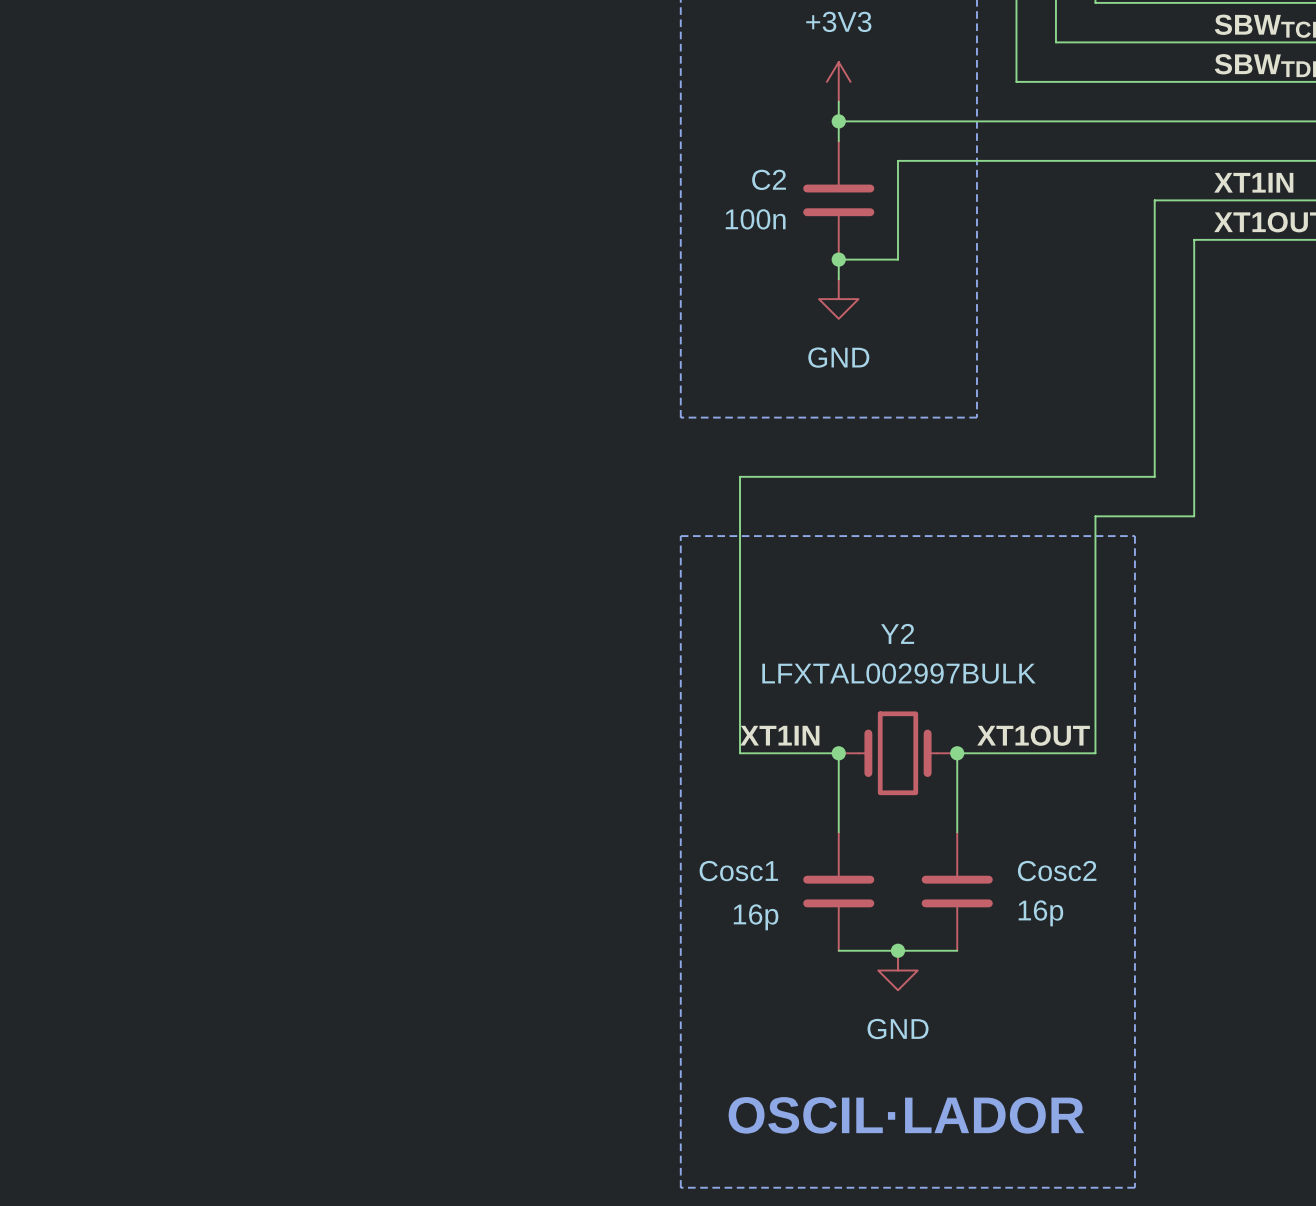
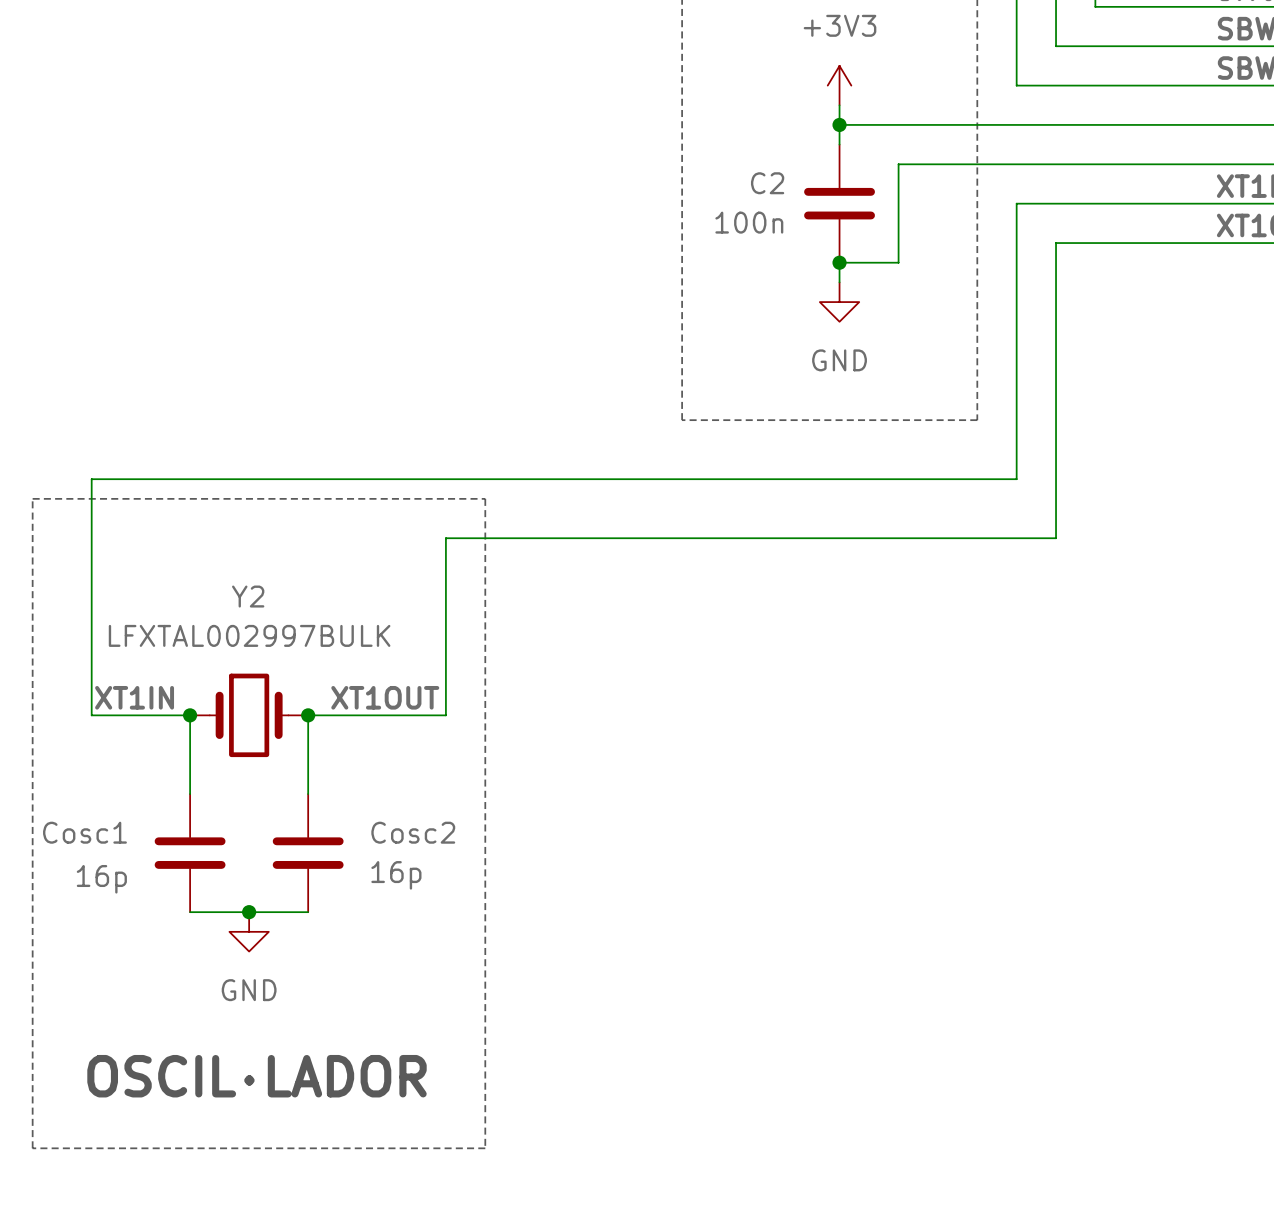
wire: (1154, 200) (1154, 476) (1016, 476) -> (1154, 203) (1016, 203) (1016, 479)
wire: (1194, 239) (1194, 516) (1095, 516) (1095, 753) (957, 753) (957, 832) -> (1193, 243) (1056, 243) (1056, 538) (445, 538) (445, 715) (308, 715) (308, 794)
wire: (740, 476) (740, 753) (838, 753) (838, 832) -> (741, 479) (91, 479) (91, 715) (190, 715) (190, 794)
line: none -> (32, 498) (485, 498) (485, 1148) (32, 1148) (32, 498)
line: (680, 536) (1134, 536) (1134, 1187) (680, 1187) (680, 536) -> none
label: none -> XT1IN (134, 697)
label: none -> XT1OUT (385, 697)
junction: none -> (190, 715)
junction: none -> (308, 715)
label: XT1IN (779, 735) -> none
label: XT1OUT (1033, 735) -> none
junction: (838, 753) -> none
Y2 position: (897, 753) -> (249, 715)
junction: (957, 753) -> none
Cosc1 position: (838, 891) -> (190, 853)
Cosc2 position: (957, 891) -> (308, 853)
wire: none -> (190, 912) (308, 912)
junction: none -> (249, 912)
power symbol: none -> GND (249, 931)
wire: (838, 950) (957, 950) -> none
junction: (897, 950) -> none
power symbol: GND (897, 970) -> none
text: none -> OSCIL·LADOR (257, 1076)
text: OSCIL·LADOR (906, 1115) -> none

